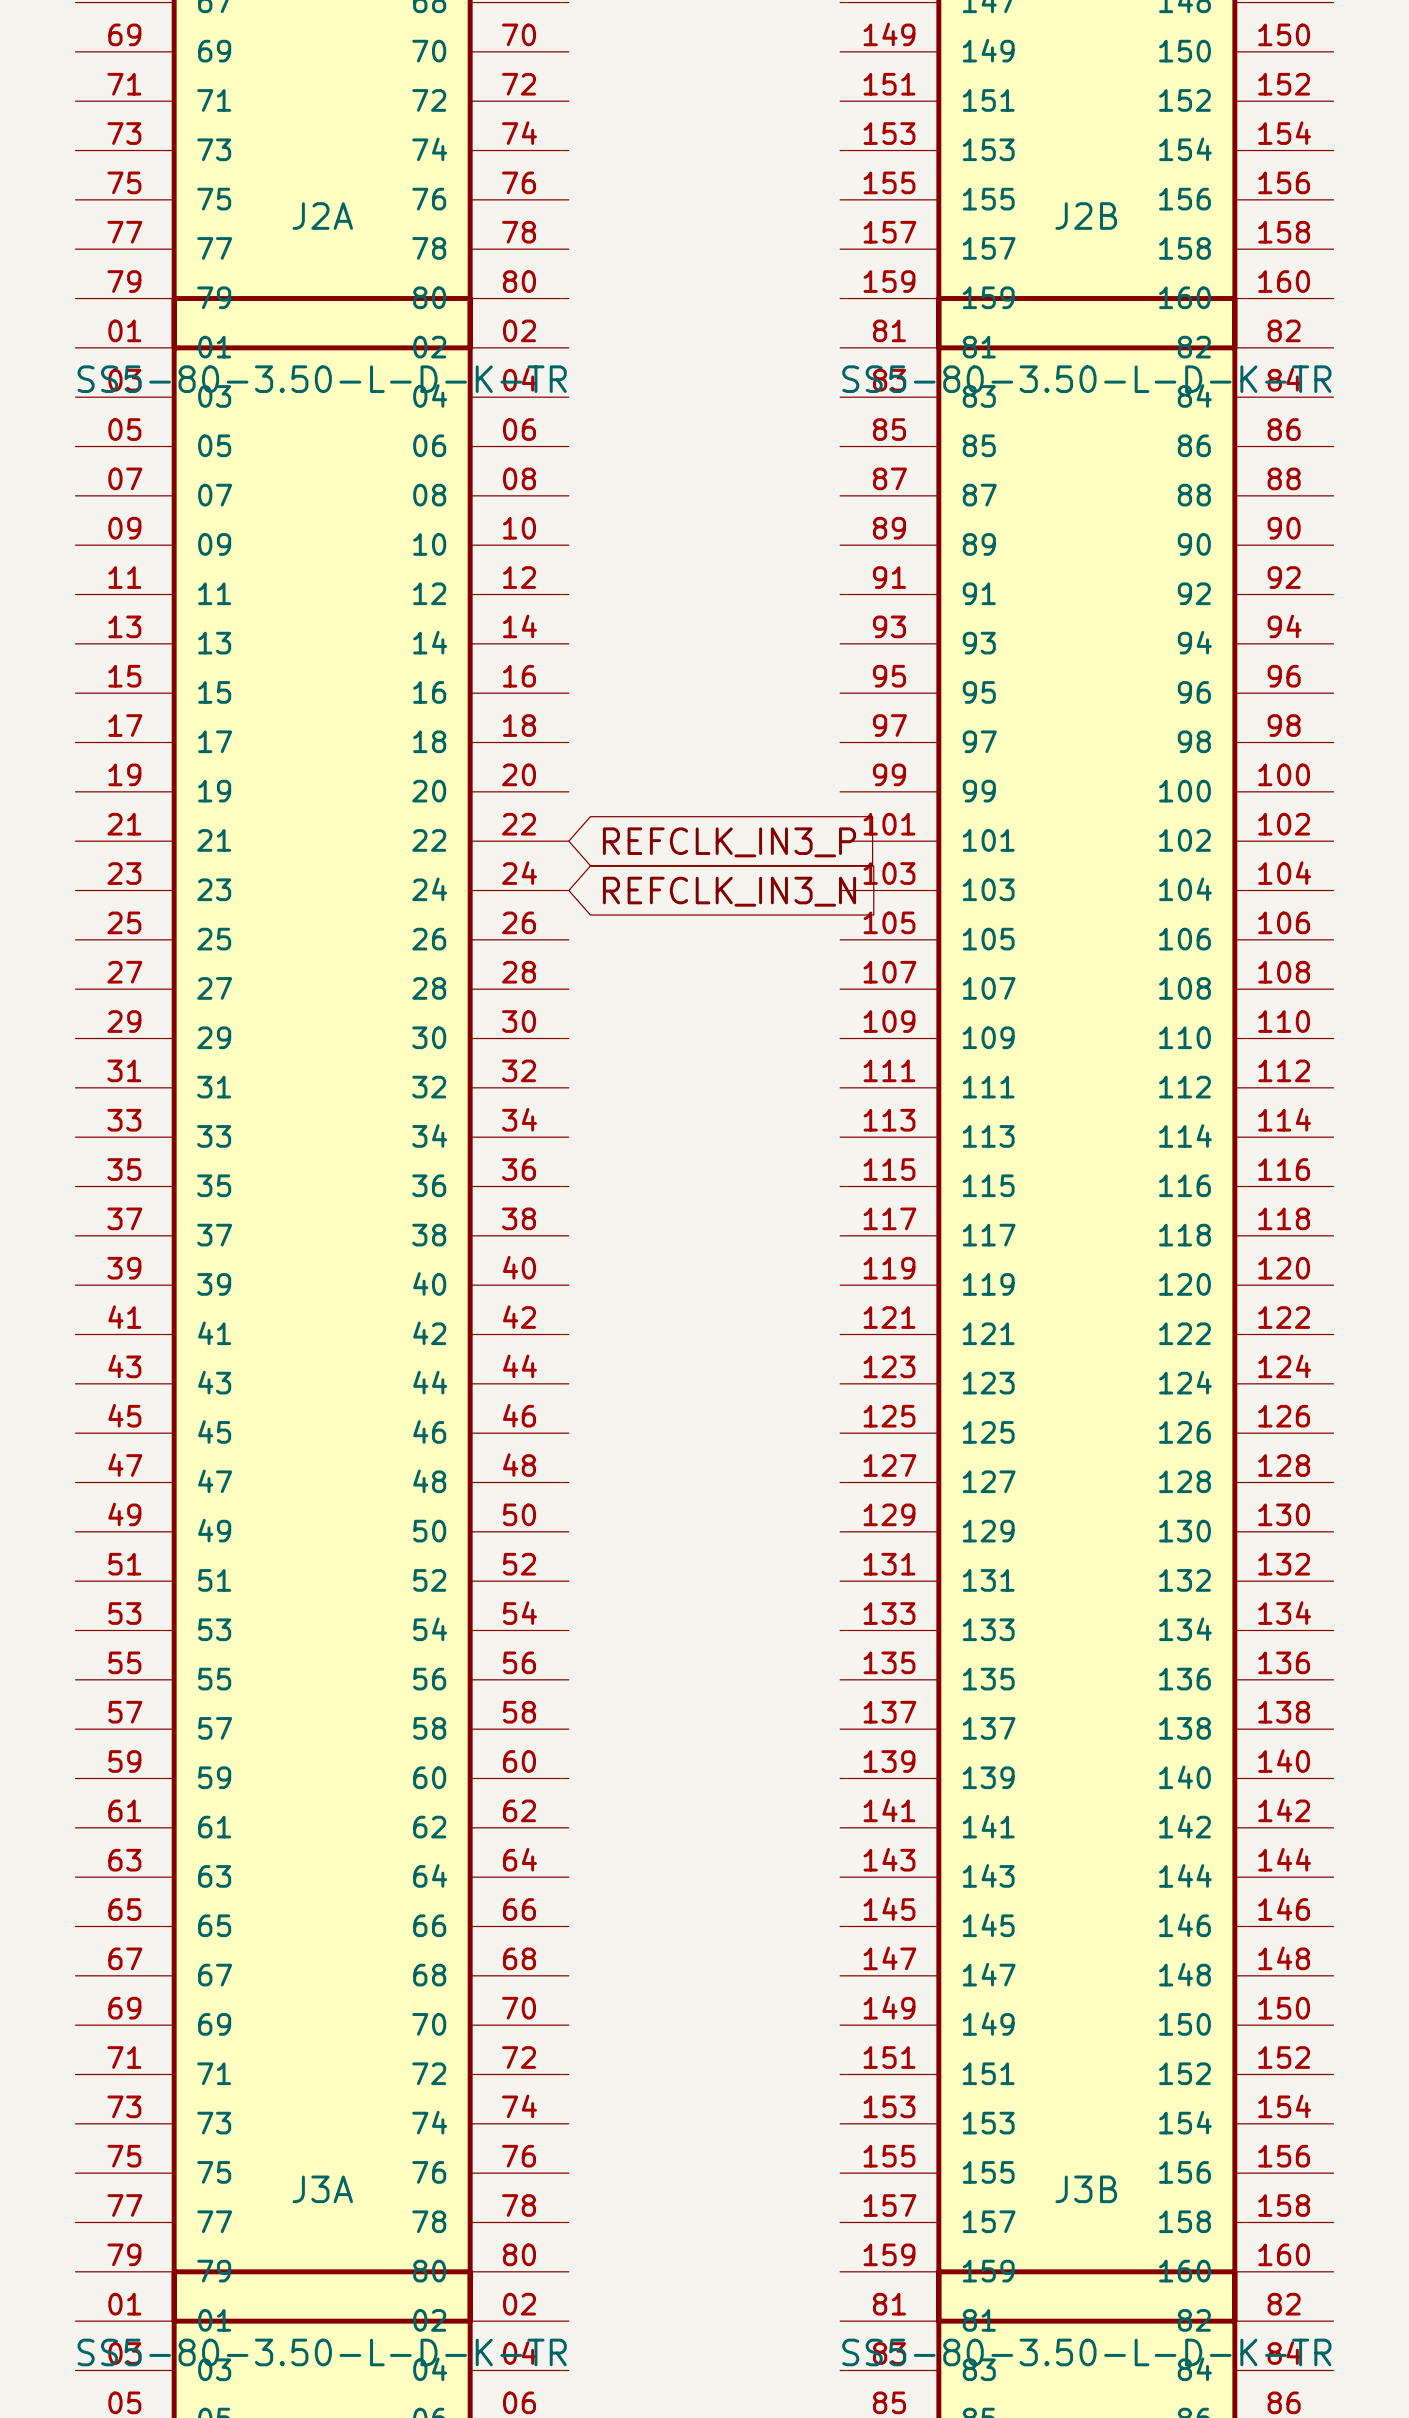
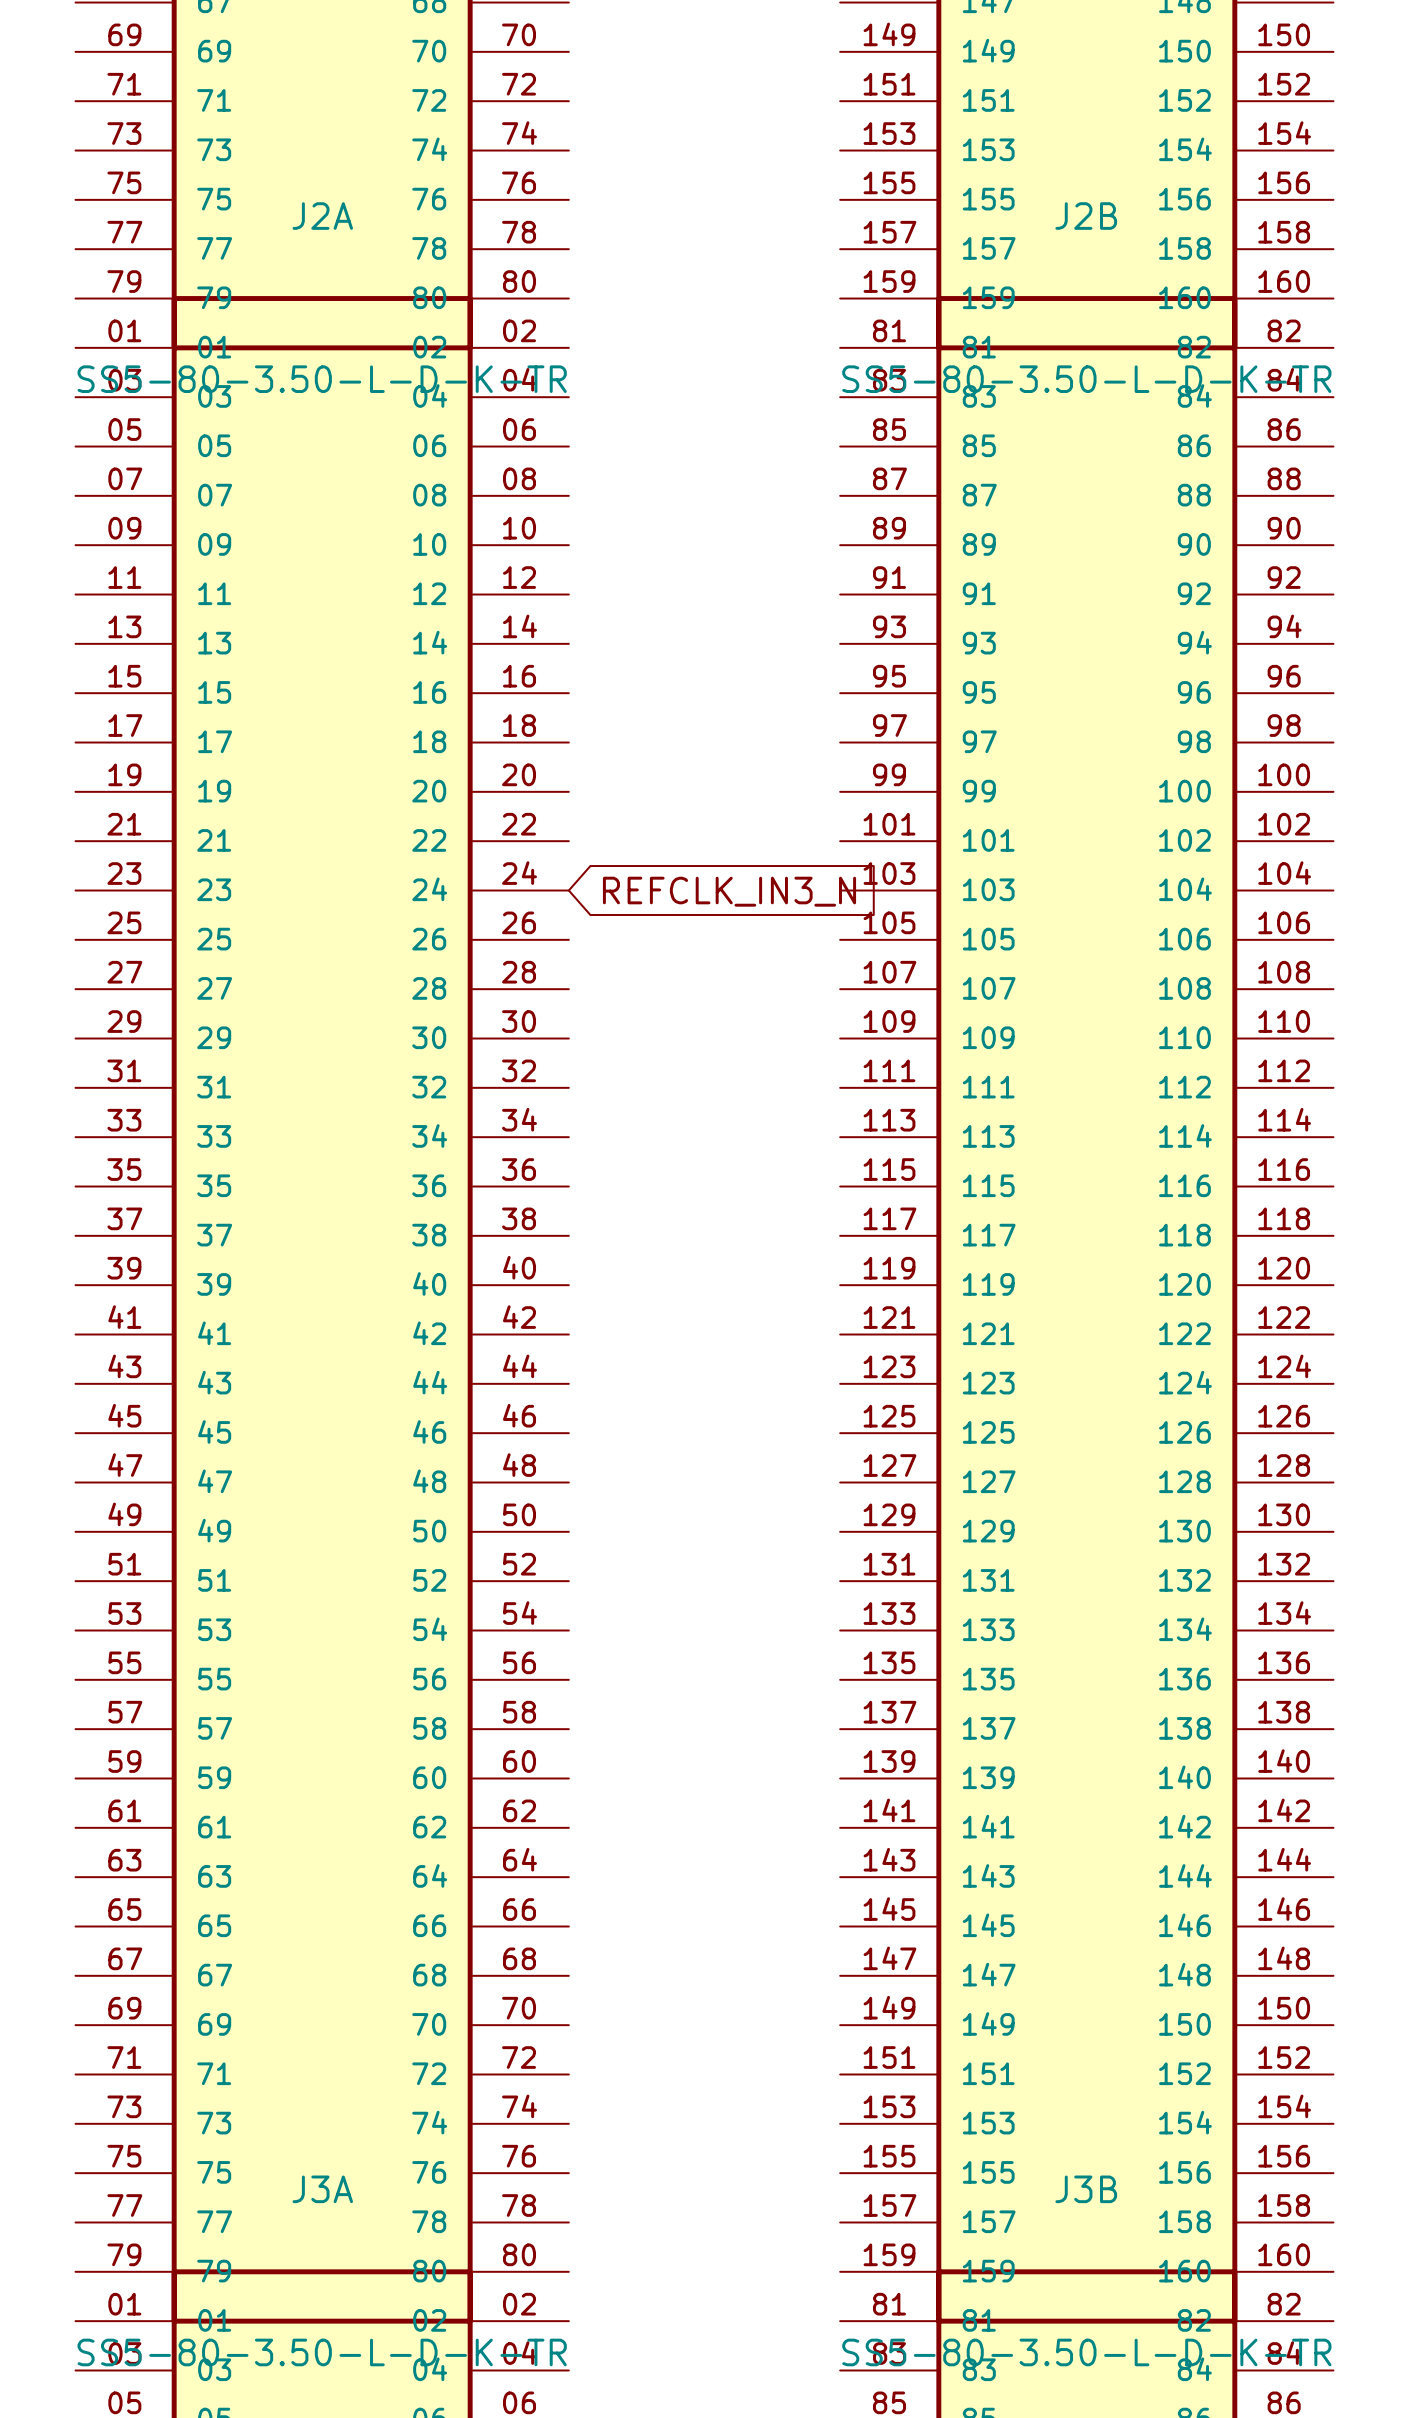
global label: REFCLK_IN3_P (729, 842) -> none

